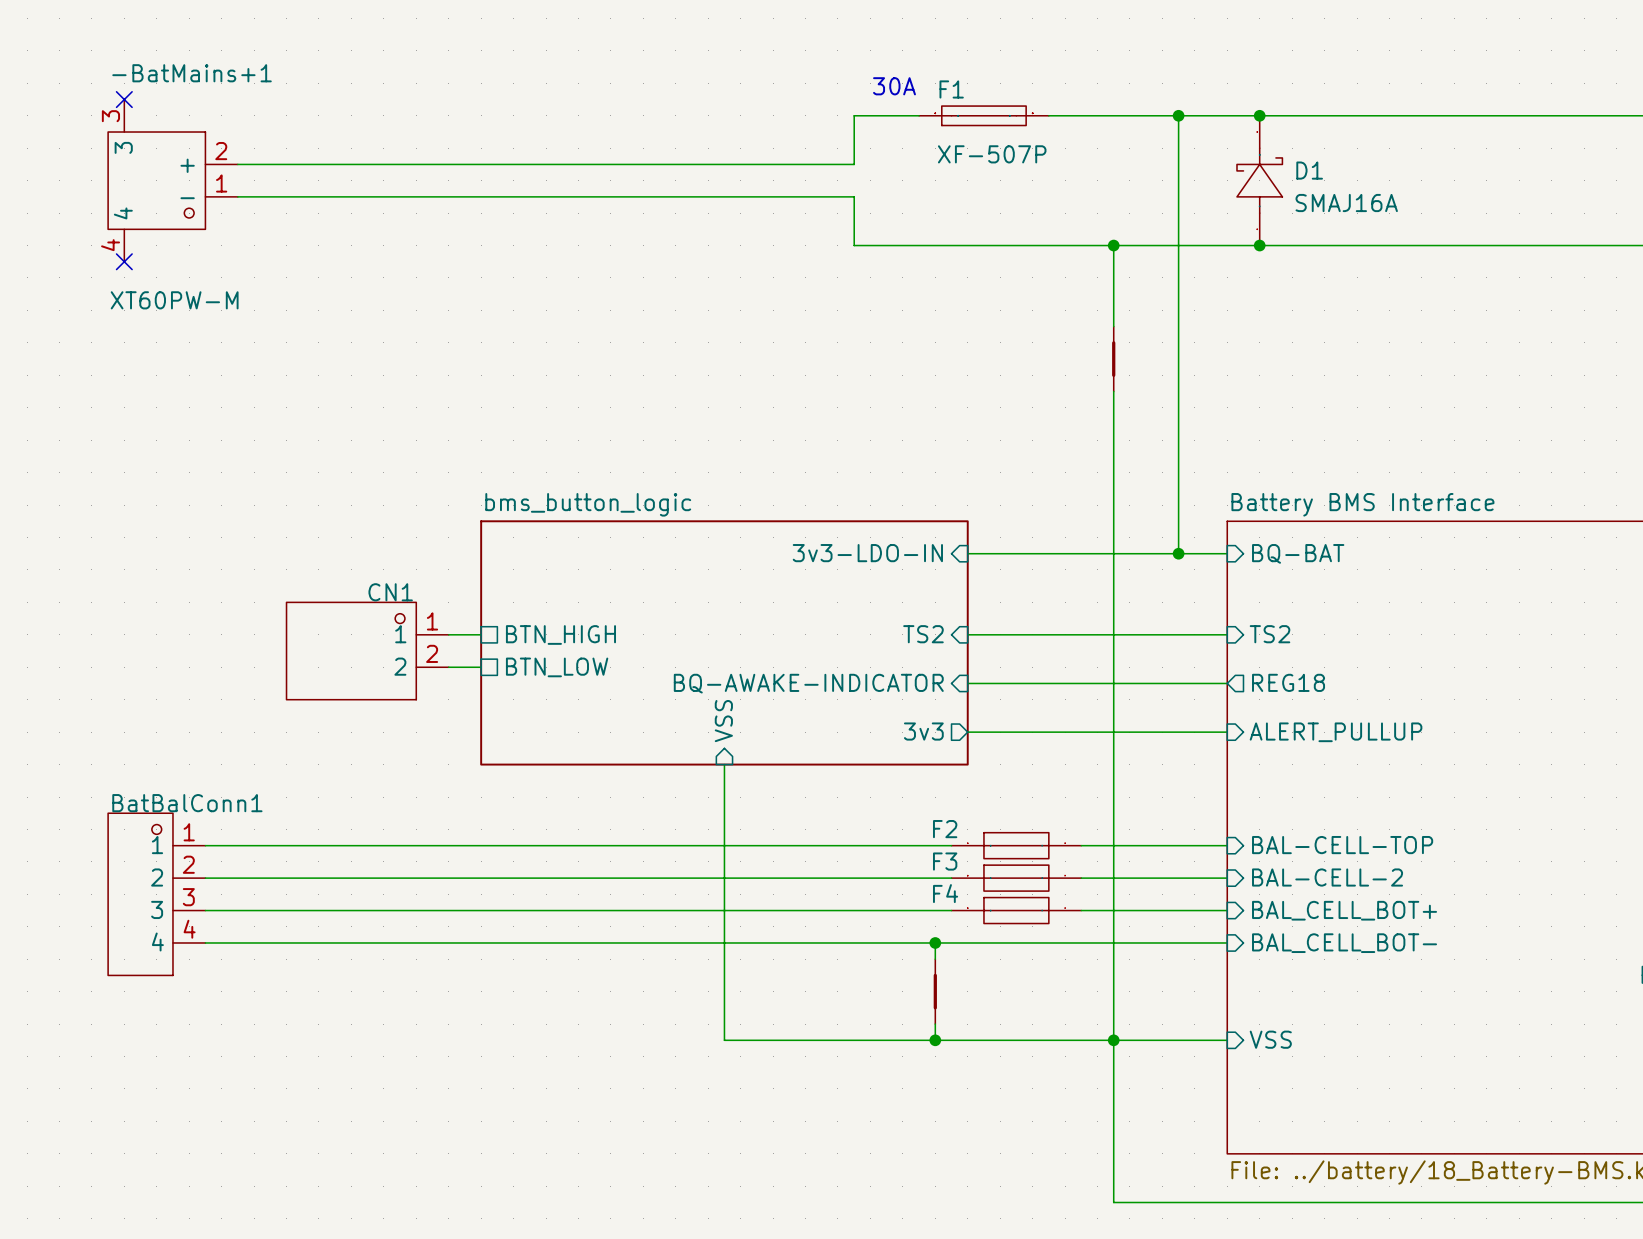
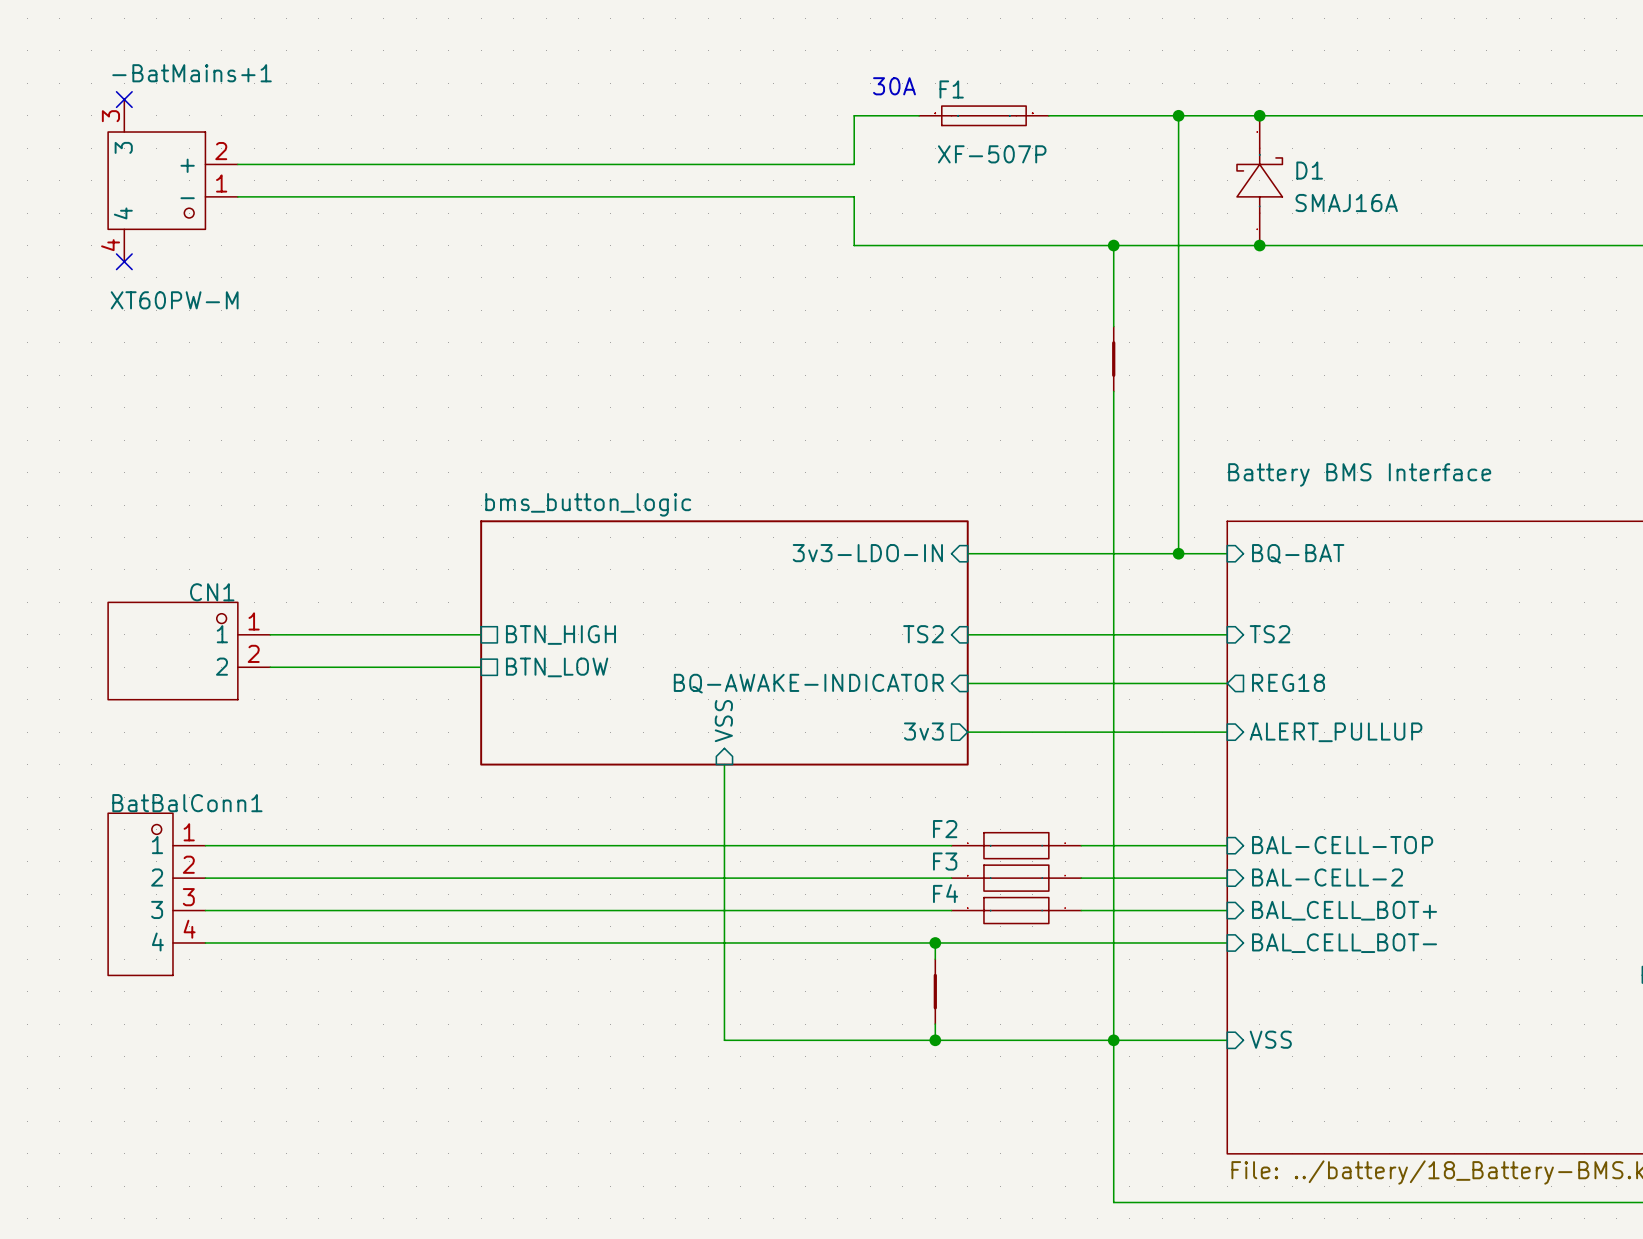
sheet Battery BMS Interface name position: Battery BMS Interface (1362, 504) -> Battery BMS Interface (1359, 474)
wire: none -> (270, 634) (448, 634)
CN1 position: (367, 651) -> (189, 651)
wire: none -> (270, 667) (448, 667)

